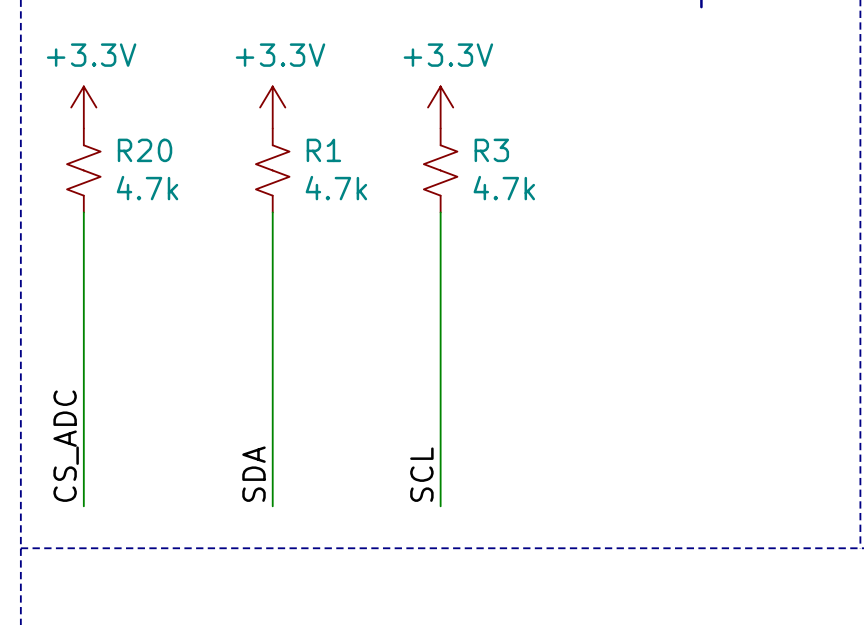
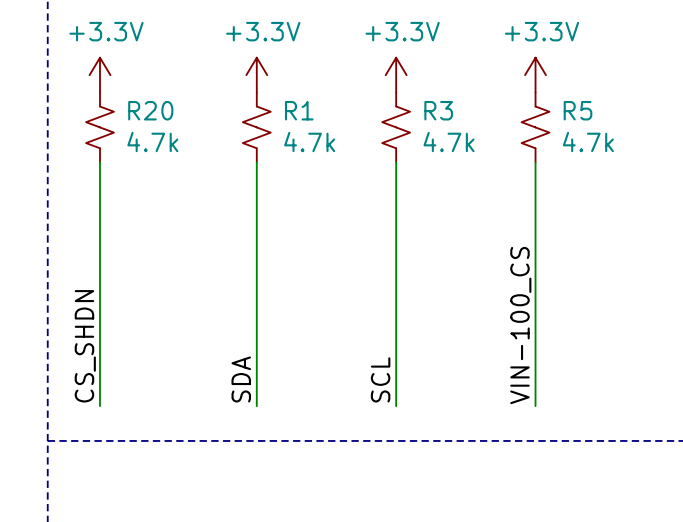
power symbol: none -> +3.3V (535, 75)
R5: none -> 4.7k (535, 127)
wire: none -> (535, 162) (535, 406)
label: none -> VIN-100_CS (520, 325)
label: CS_ADC (66, 446) -> CS_SHDN (85, 346)

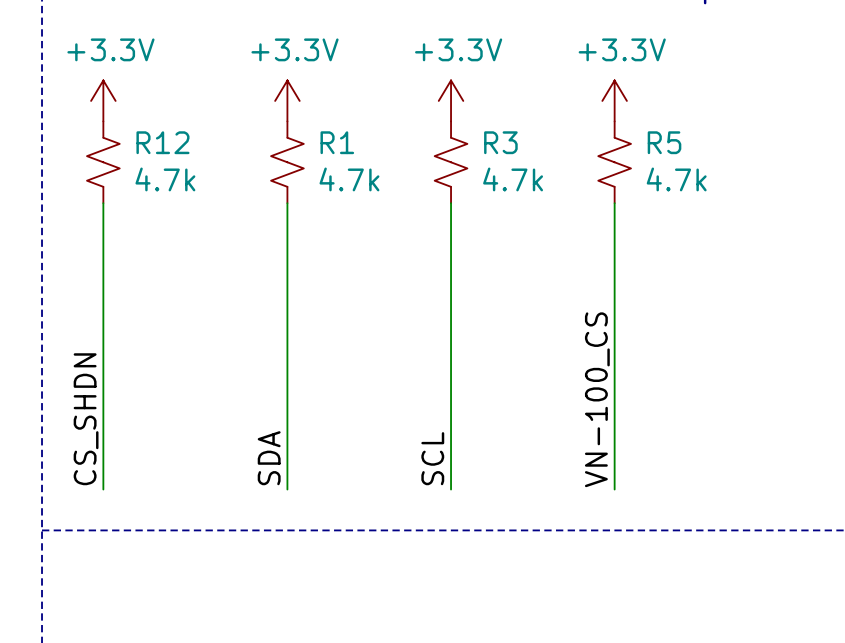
R20 name: R20 (150, 110) -> R12 (162, 142)
label: VIN-100_CS (520, 325) -> VN-100_CS (597, 399)

